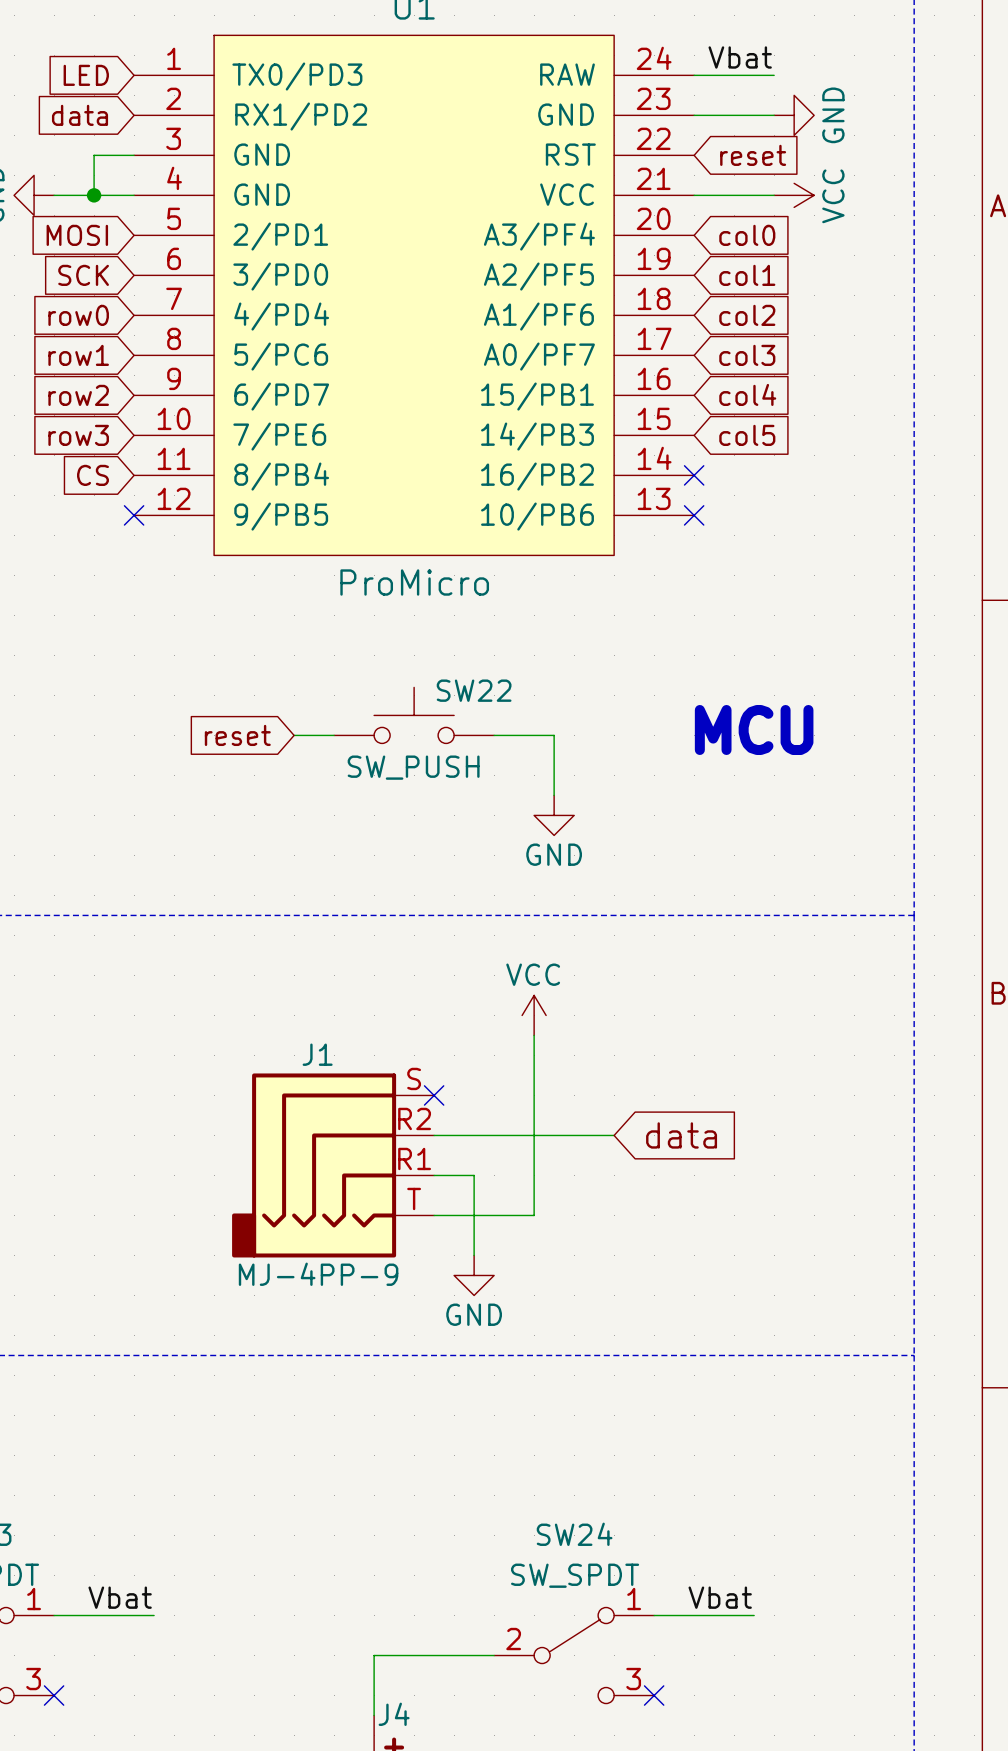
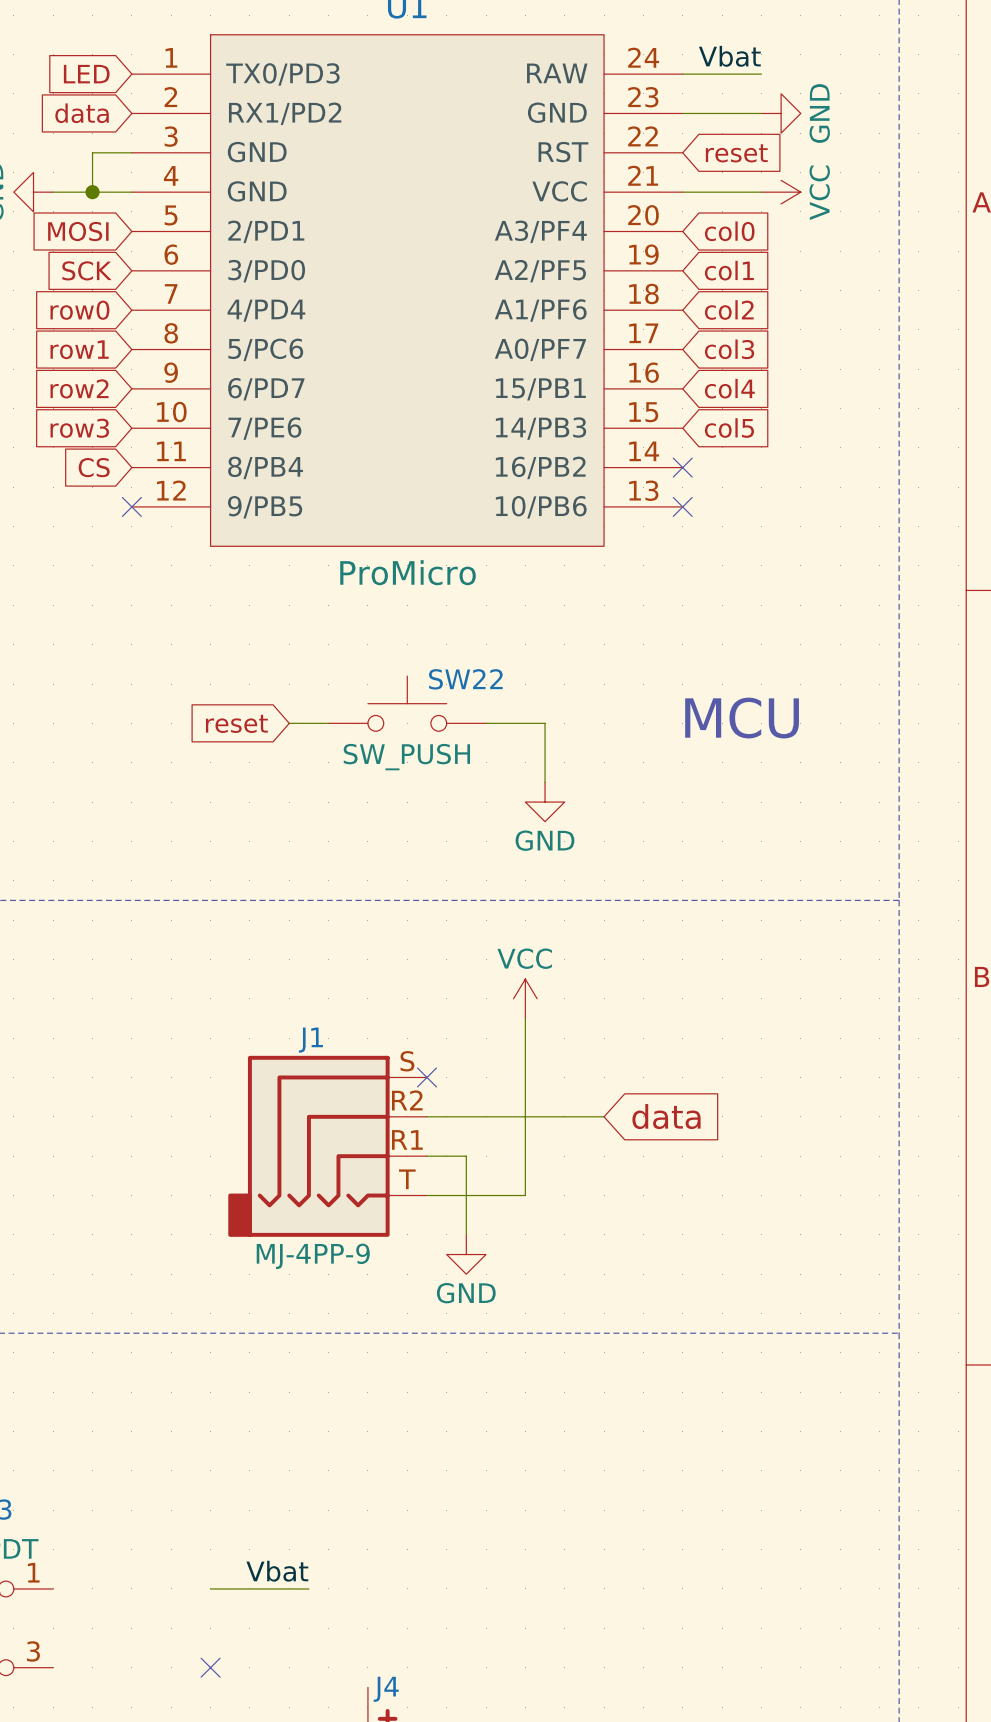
label position: Vbat (120, 1597) -> Vbat (277, 1571)
label: Vbat (720, 1597) -> none
wire: (54, 1615) (154, 1615) -> (210, 1588) (308, 1588)
wire: (654, 1615) (754, 1615) -> none
wire: (494, 1655) (374, 1655) (374, 1715) -> none
SW24: SW_SPDT (574, 1655) -> none
no-connect mark: (54, 1695) -> none
no-connect mark: none -> (210, 1667)
no-connect mark: (654, 1695) -> none

